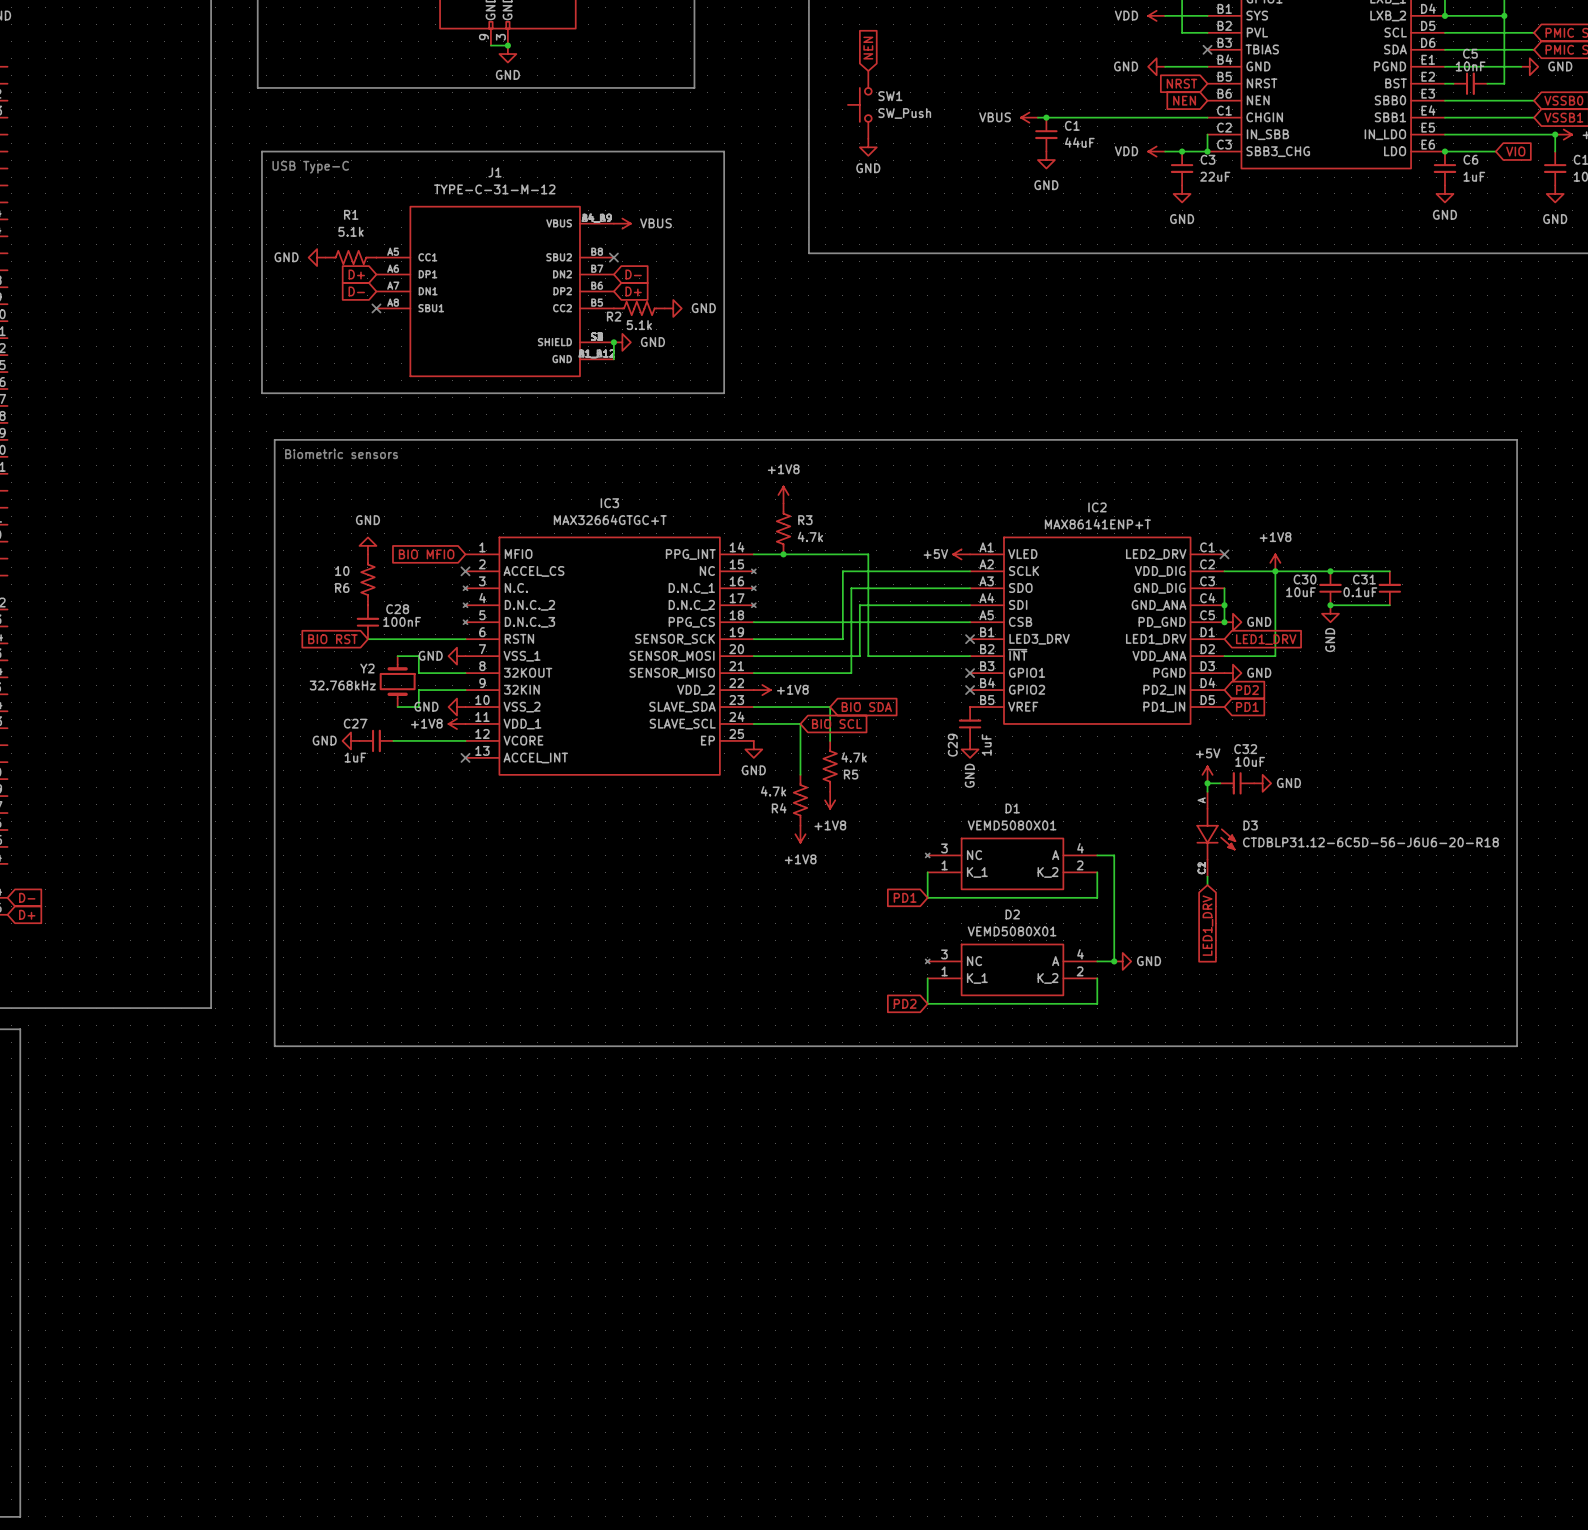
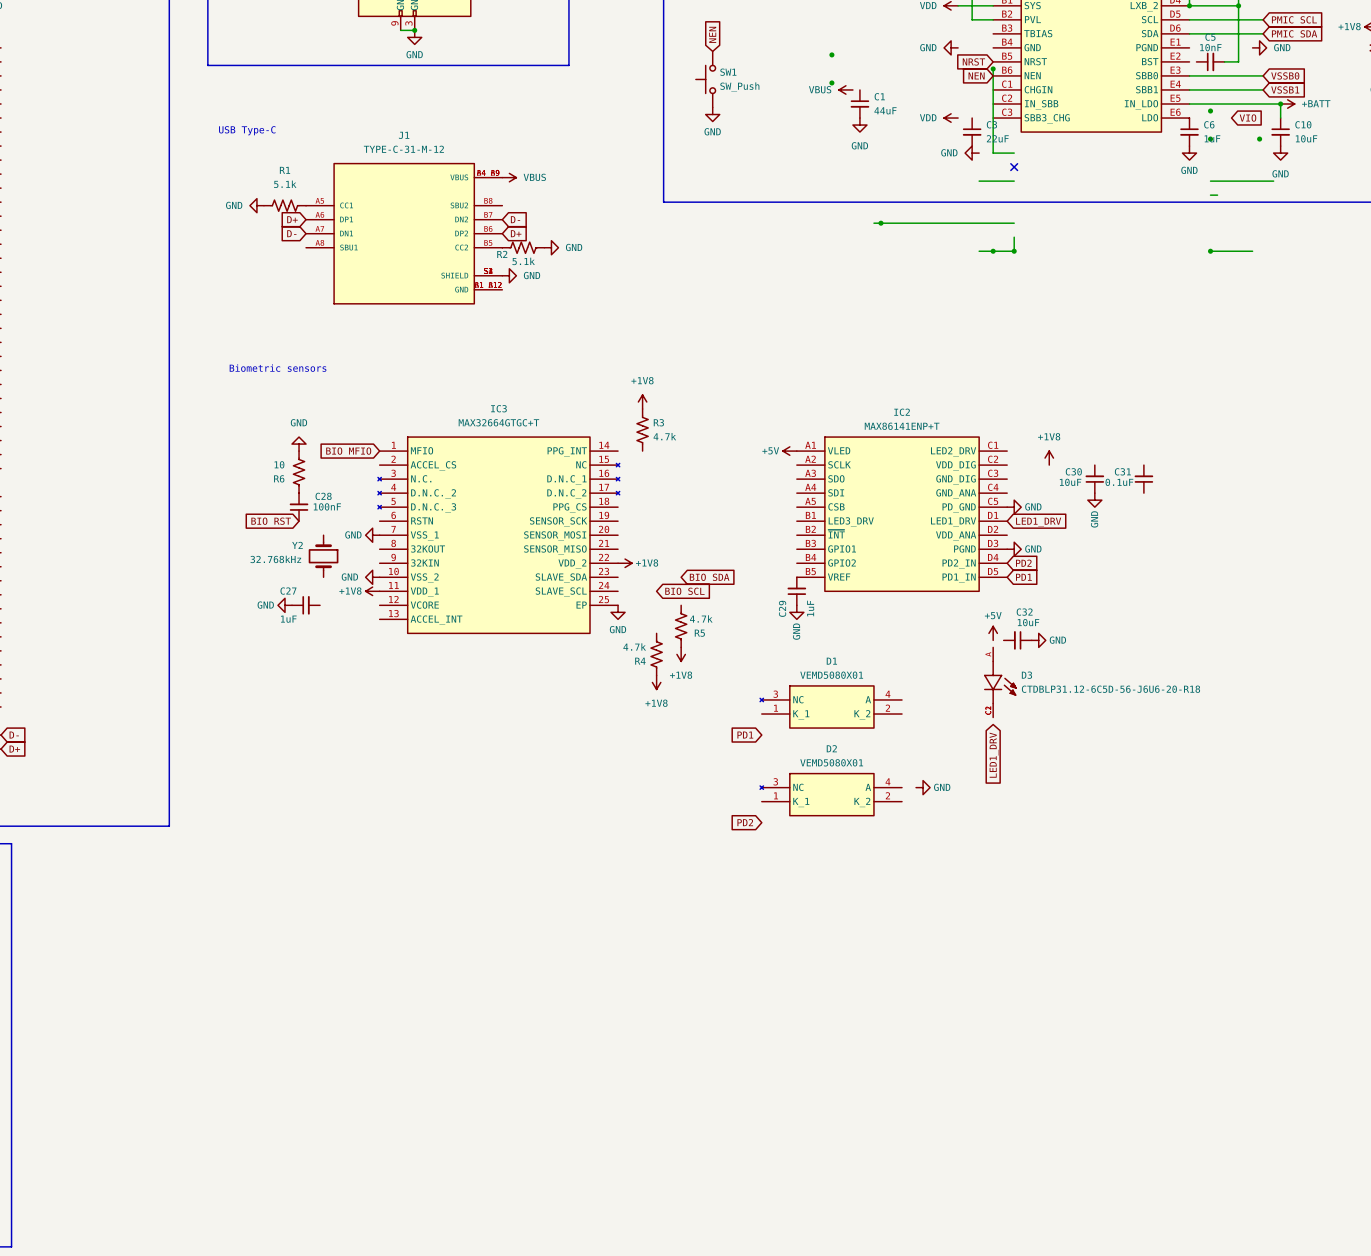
no-connect mark: (1207, 49) -> none
wire: (1165, 66) (1207, 66) -> (979, 181) (1014, 181)
wire: (1444, 66) (1521, 66) -> (1210, 181) (1273, 181)
junction: none -> (831, 54)
wire: (1444, 83) (1453, 83) -> (1210, 195) (1217, 195)
wire: none -> (993, 68) (993, 104)
junction: none -> (993, 68)
junction: none -> (831, 82)
wire: (1037, 117) (1207, 117) -> (873, 223) (1014, 223)
junction: (1046, 117) -> none
junction: none -> (1210, 111)
line: (261, 151) (724, 151) (724, 393) (261, 393) (261, 151) -> none
wire: (1165, 151) (1207, 151) -> (1014, 153) (993, 153) (993, 118)
junction: (1182, 151) -> none
junction: (1207, 151) -> none
wire: (1444, 151) (1495, 151) -> (1210, 251) (1252, 251)
junction: (1444, 151) -> none
junction: none -> (1210, 139)
junction: none -> (1259, 139)
power symbol rotation: 0° (1182, 193) -> 90° clockwise (972, 153)
no-connect mark: none -> (1014, 167)
no-connect mark: (613, 257) -> none
junction: none -> (880, 223)
wire: none -> (1014, 237) (1014, 251) (979, 251)
no-connect mark: (376, 308) -> none
junction: none -> (993, 251)
junction: none -> (1014, 251)
junction: none -> (1210, 251)
wire: (613, 342) (613, 359) -> none
junction: (613, 342) -> none
line: (274, 439) (1517, 439) (1517, 1046) (274, 1046) (274, 439) -> none
wire: (753, 554) (868, 554) (868, 656) (970, 656) -> none
junction: (783, 554) -> none
no-connect mark: (1224, 554) -> none
no-connect mark: (465, 571) -> none
wire: (970, 571) (842, 571) (842, 639) (753, 639) -> none
wire: (1224, 571) (1389, 571) -> none
wire: (1275, 571) (1275, 656) (1224, 656) -> none
junction: (1275, 571) -> none
junction: (1330, 571) -> none
wire: (970, 588) (851, 588) (851, 673) (753, 673) -> none
wire: (1224, 588) (1224, 622) -> none
wire: (970, 605) (859, 605) (859, 656) (753, 656) -> none
junction: (1224, 605) -> none
wire: (1330, 605) (1389, 605) -> none
junction: (1330, 605) -> none
wire: (753, 622) (970, 622) -> none
junction: (1224, 622) -> none
wire: (367, 639) (465, 639) -> none
no-connect mark: (970, 639) -> none
wire: (397, 656) (418, 656) (418, 673) (465, 673) -> none
no-connect mark: (970, 673) -> none
wire: (465, 690) (418, 690) (418, 707) (397, 707) -> none
no-connect mark: (970, 690) -> none
wire: (753, 707) (830, 707) (830, 740) -> none
wire: (753, 723) (800, 723) (800, 774) -> none
wire: (393, 740) (465, 740) -> none
no-connect mark: (465, 757) -> none
junction: (1207, 783) -> none
wire: (1220, 783) (1207, 783) (1207, 791) -> none
wire: (1097, 855) (1114, 855) (1114, 961) (1097, 961) -> none
wire: (927, 872) (927, 897) (1097, 897) (1097, 872) -> none
wire: (1207, 876) (1207, 885) -> none
junction: (1114, 961) -> none
wire: (927, 978) (927, 1003) (1097, 1003) (1097, 978) -> none

